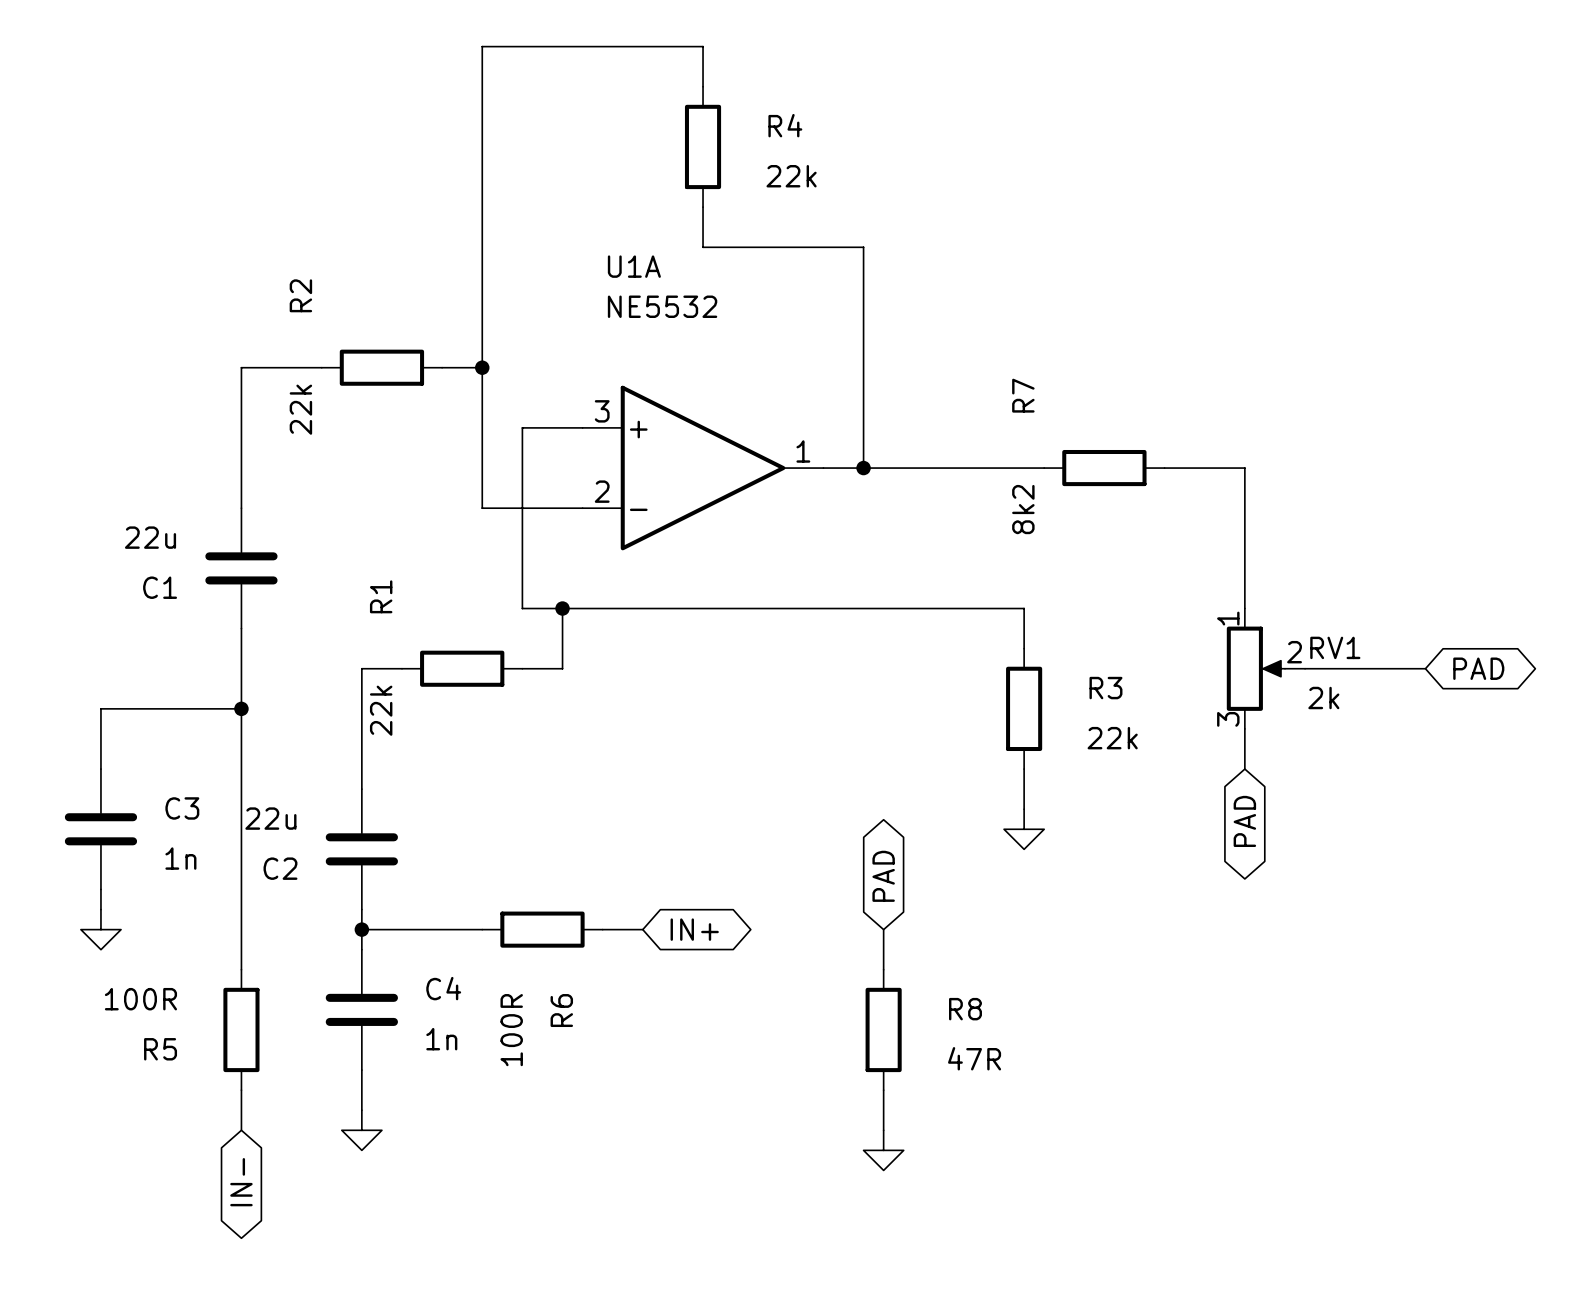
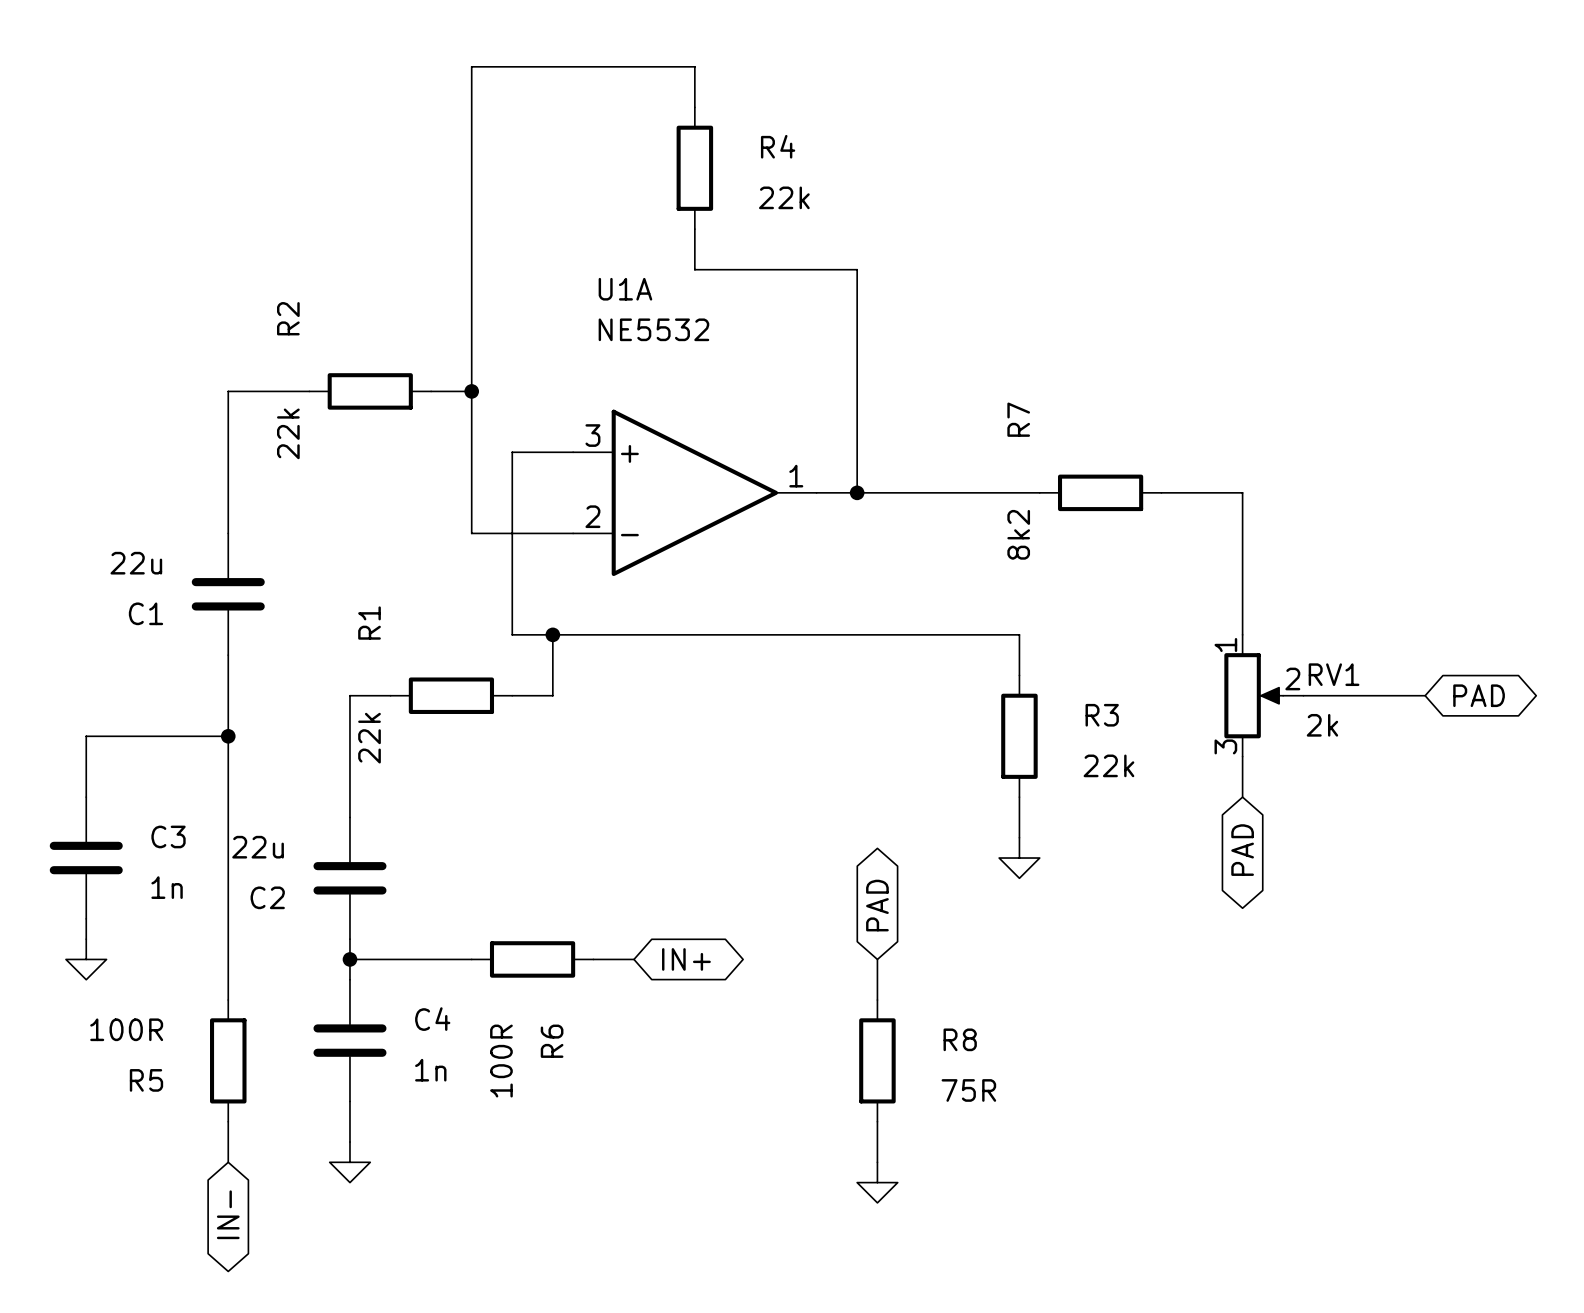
R8 value: 47R (974, 1058) -> 75R (968, 1090)

